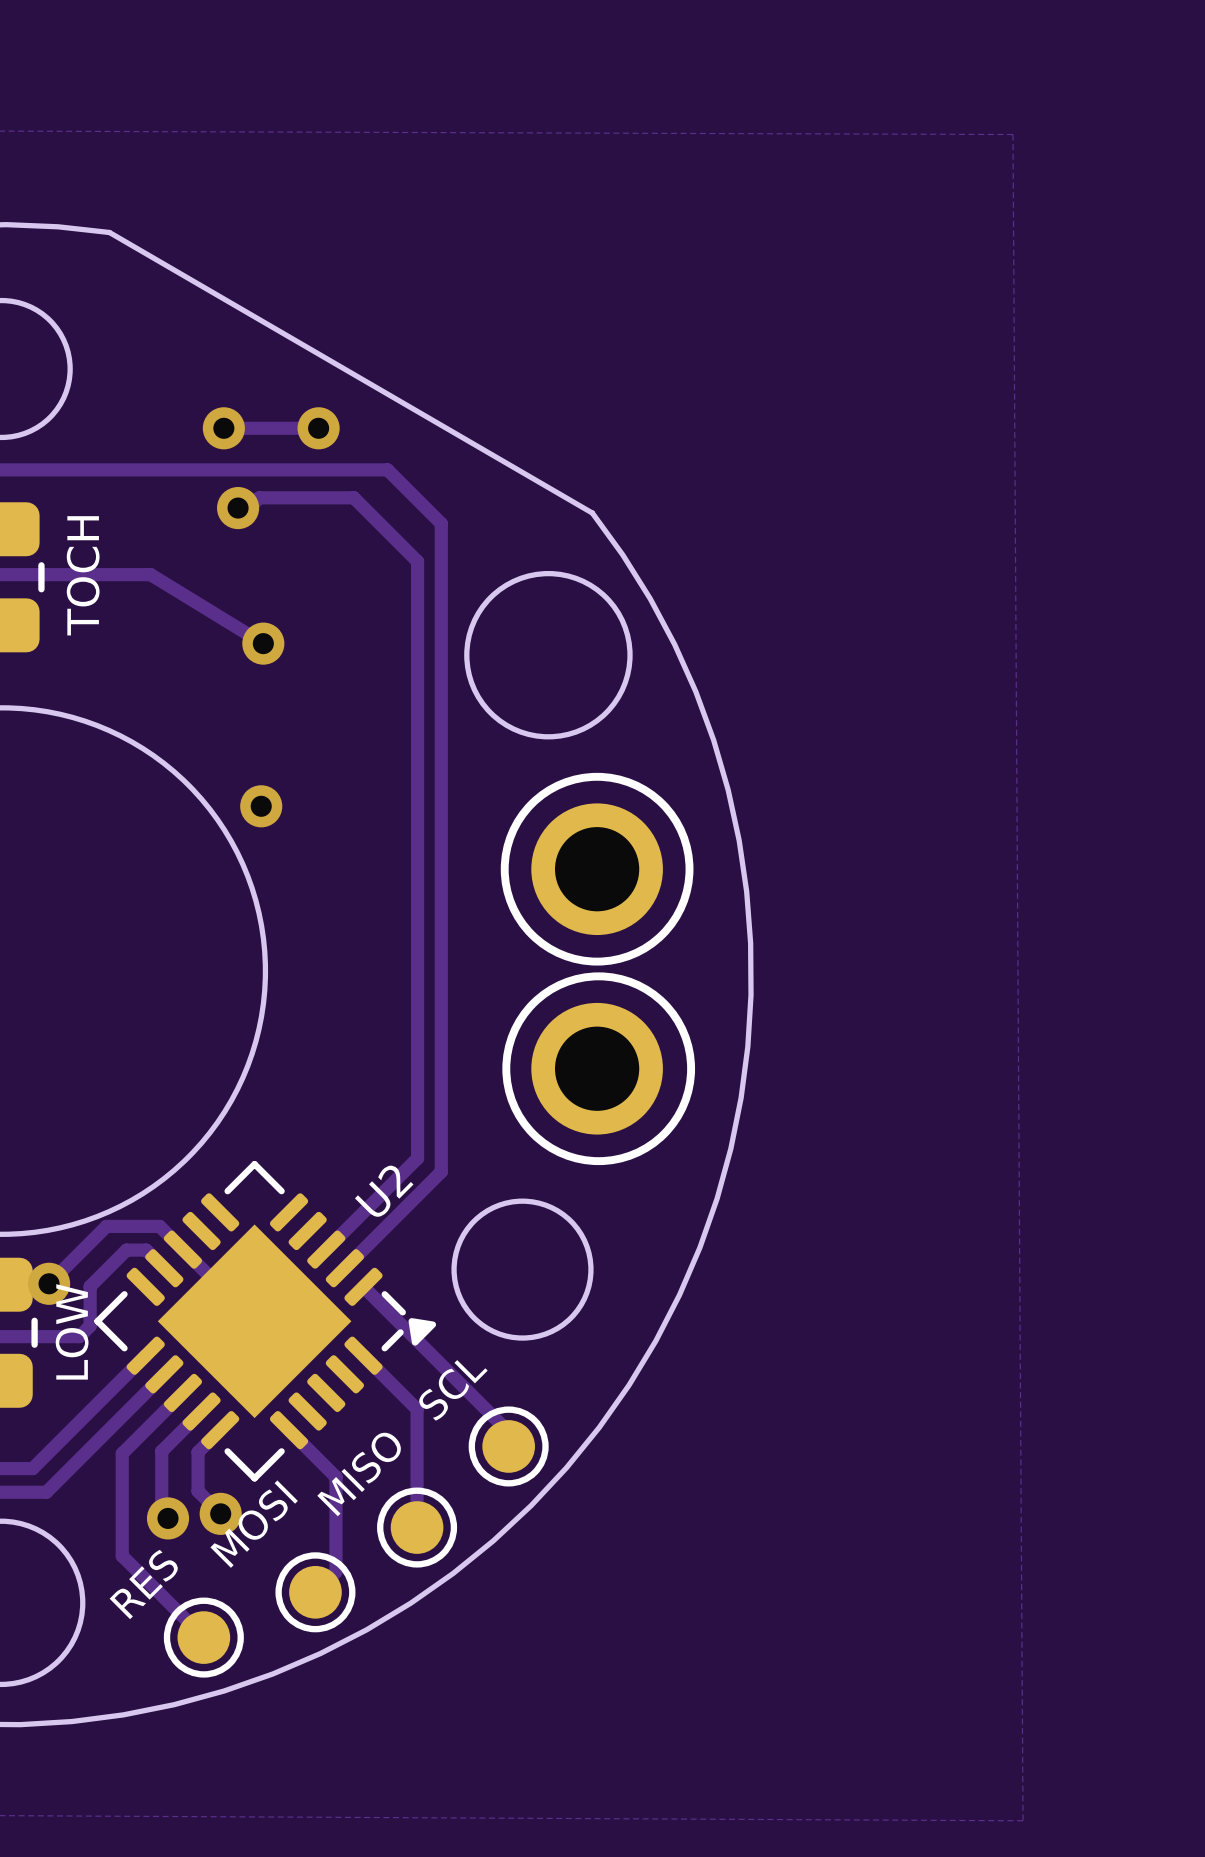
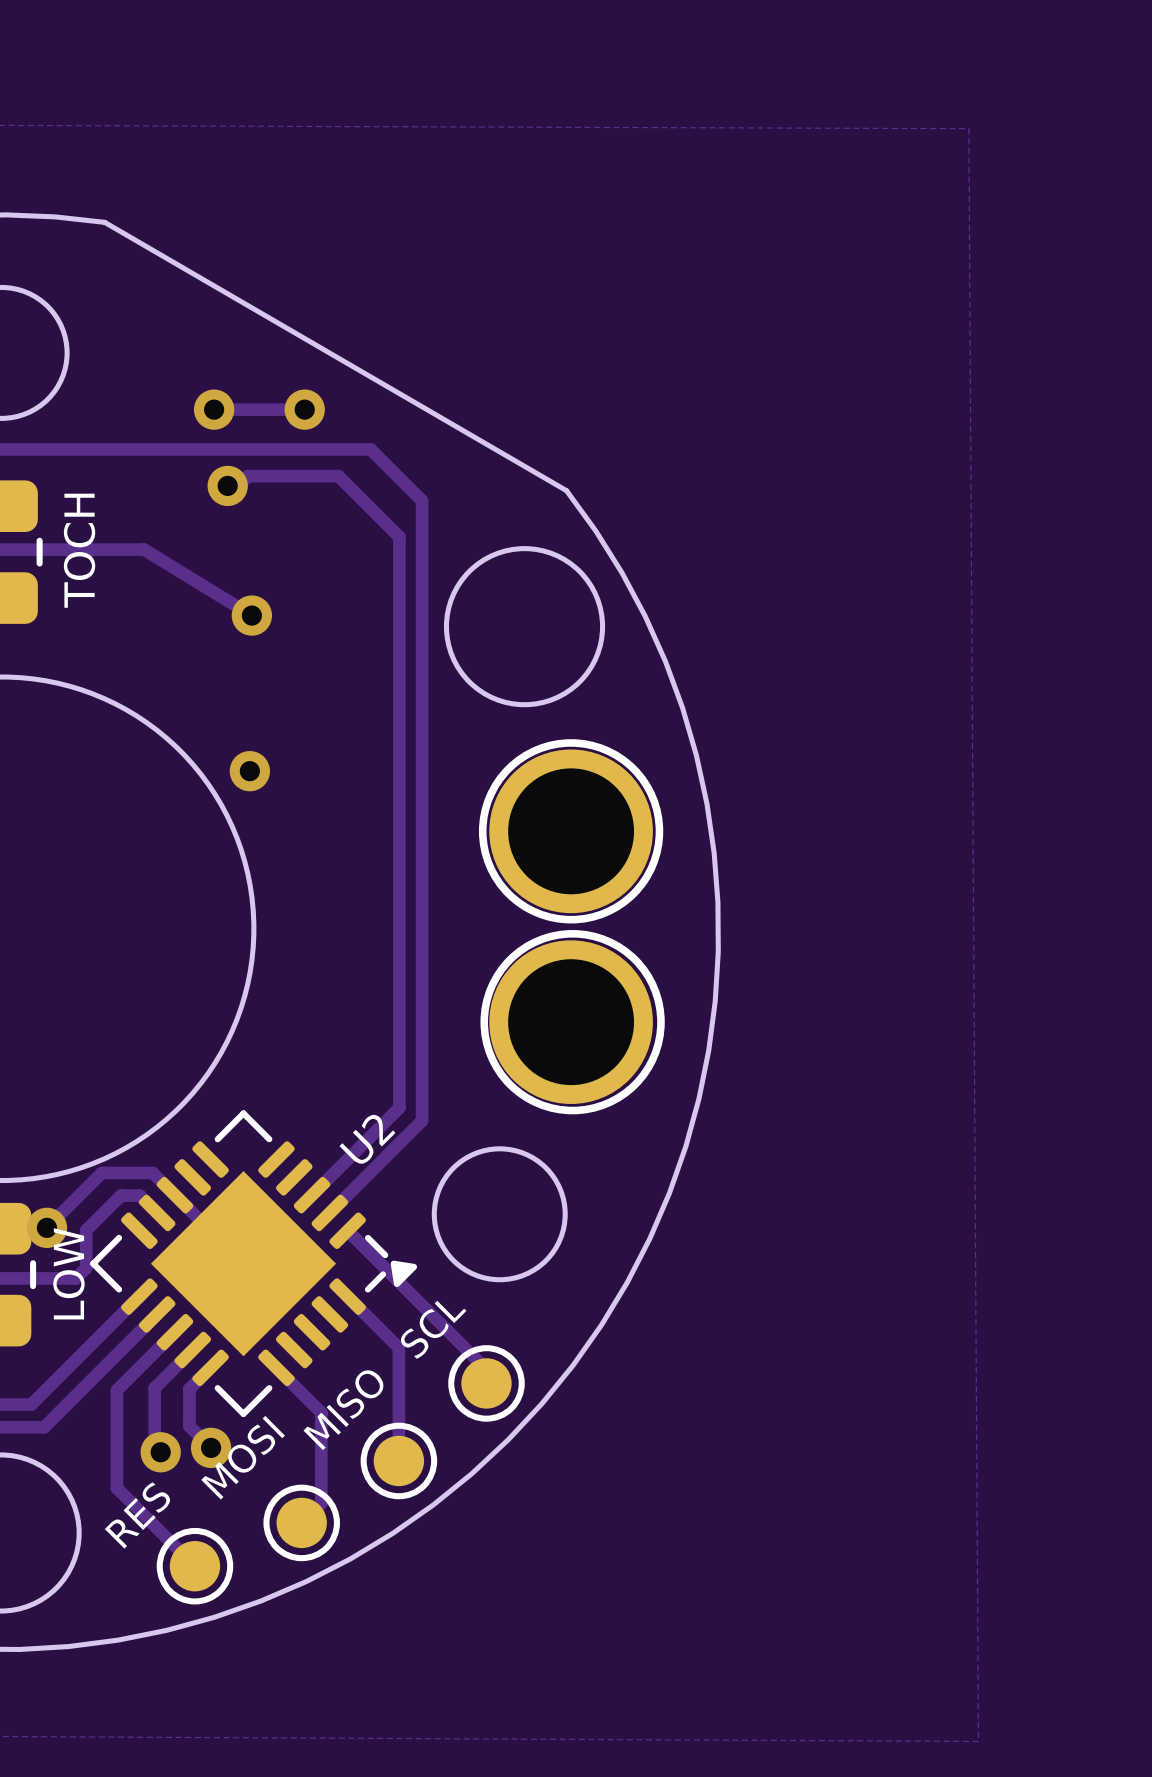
part footprint: [531, 803, 663, 936] -> [489, 749, 653, 914]
part footprint: [531, 1002, 663, 1135] -> [489, 940, 653, 1104]

